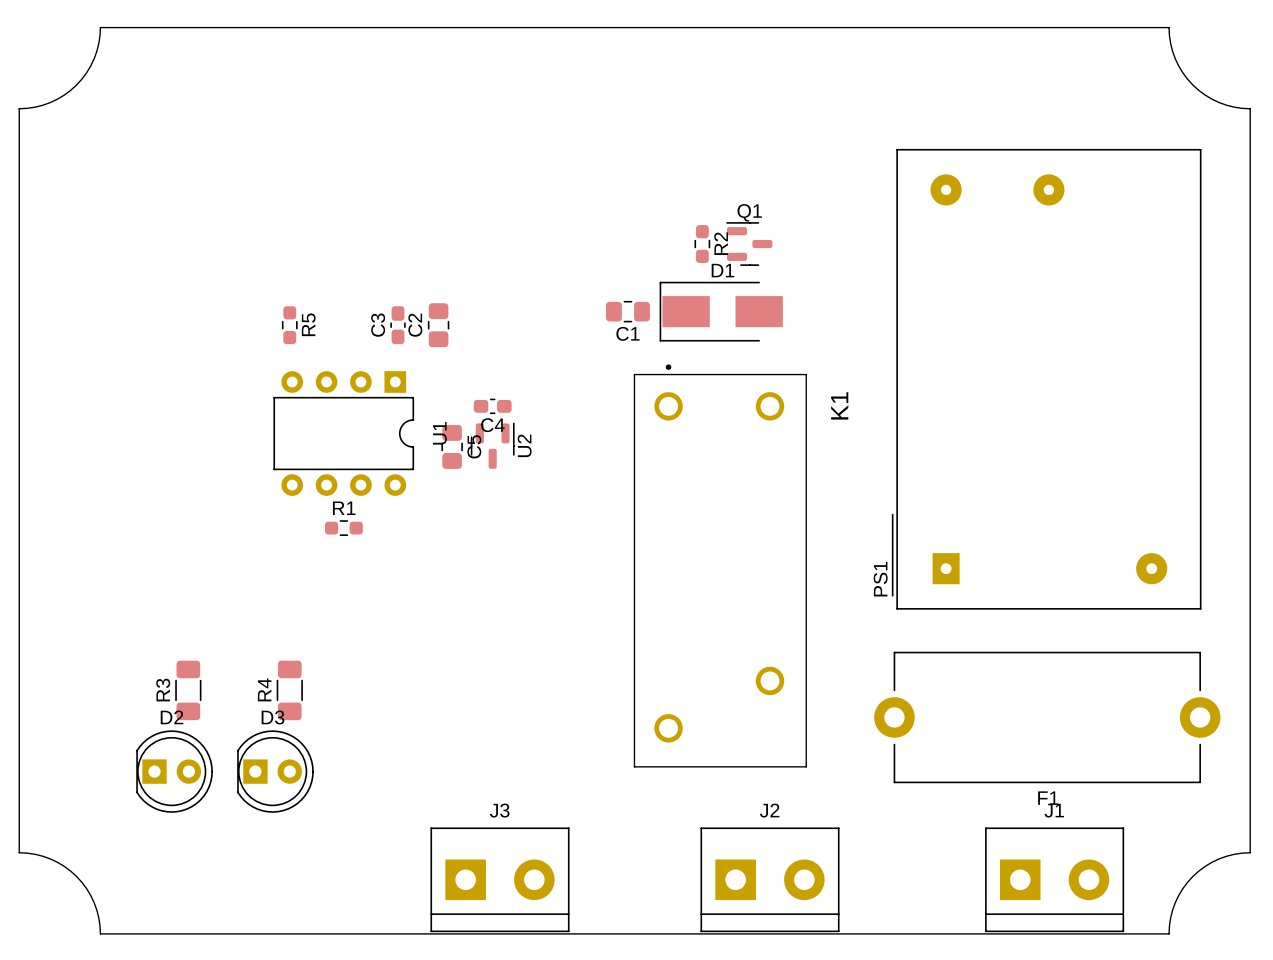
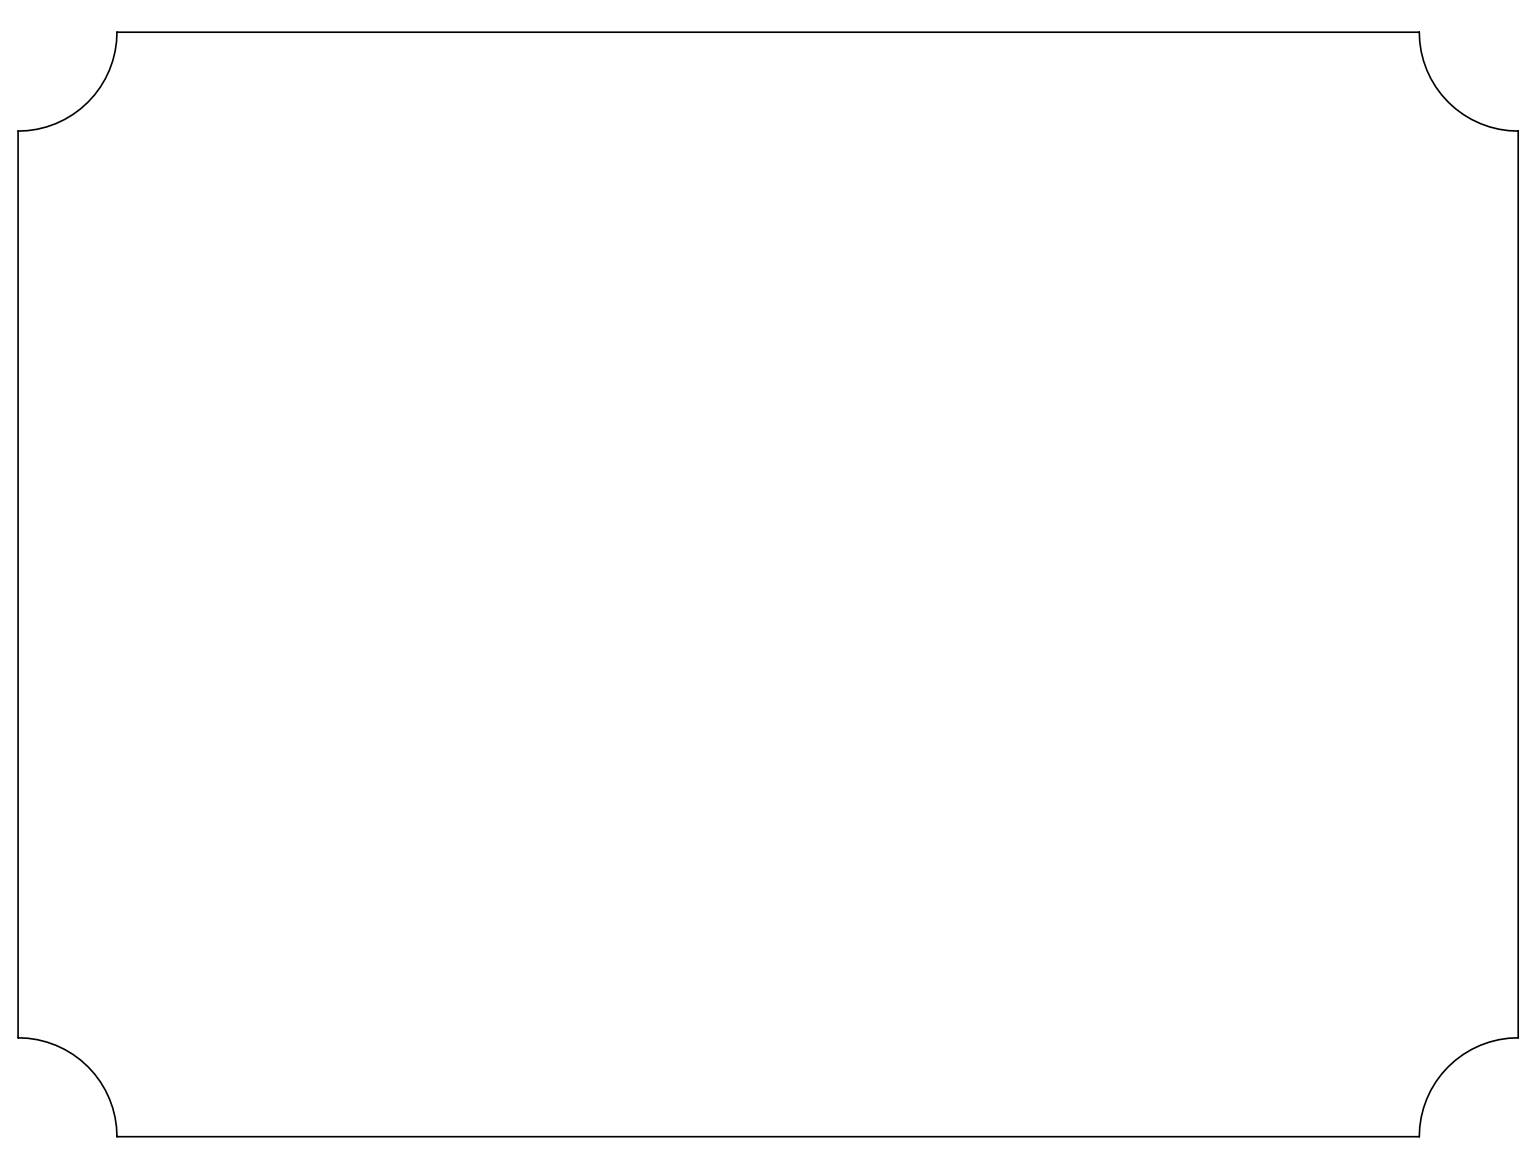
R2: (702, 244) -> none
Q1: (749, 244) -> none
C1: (627, 311) -> none
D1: (721, 311) -> none
R5: (289, 325) -> none
C3: (398, 325) -> none
C2: (438, 325) -> none
PS1: (1046, 379) -> none
C4: (492, 406) -> none
U1: (343, 433) -> none
U2: (492, 445) -> none
C5: (452, 446) -> none
R1: (343, 528) -> none
K1: (720, 565) -> none
R3: (188, 690) -> none
R4: (289, 690) -> none
F1: (1047, 717) -> none
D2: (174, 771) -> none
D3: (275, 771) -> none
J3: (499, 879) -> none
J2: (770, 879) -> none
J1: (1054, 879) -> none

